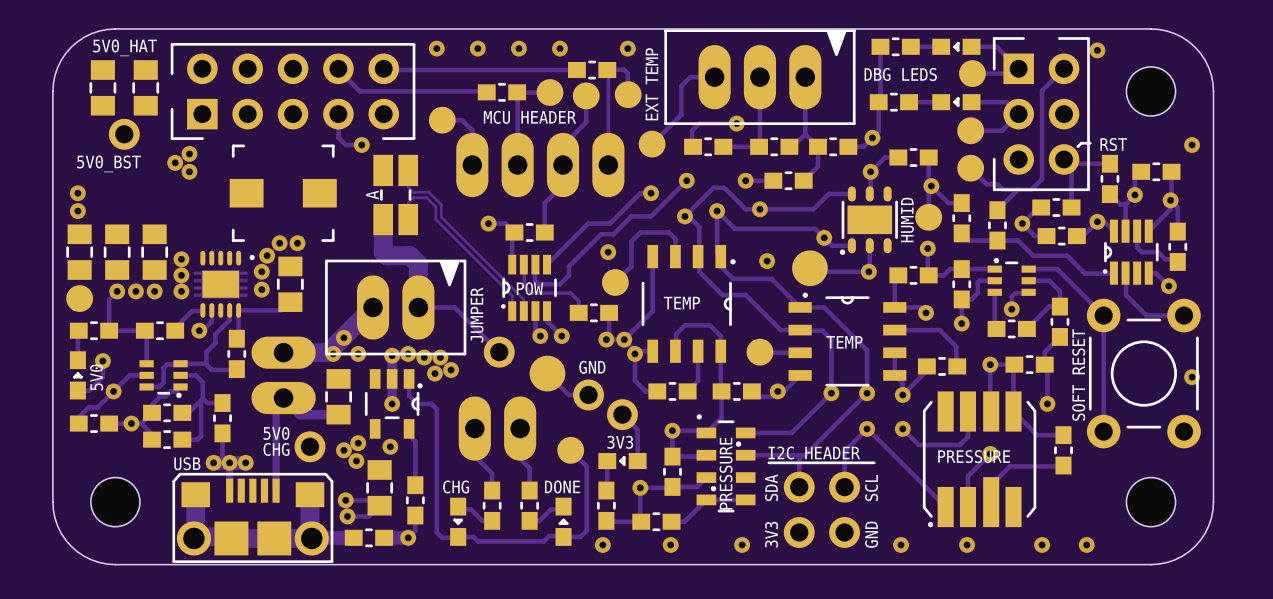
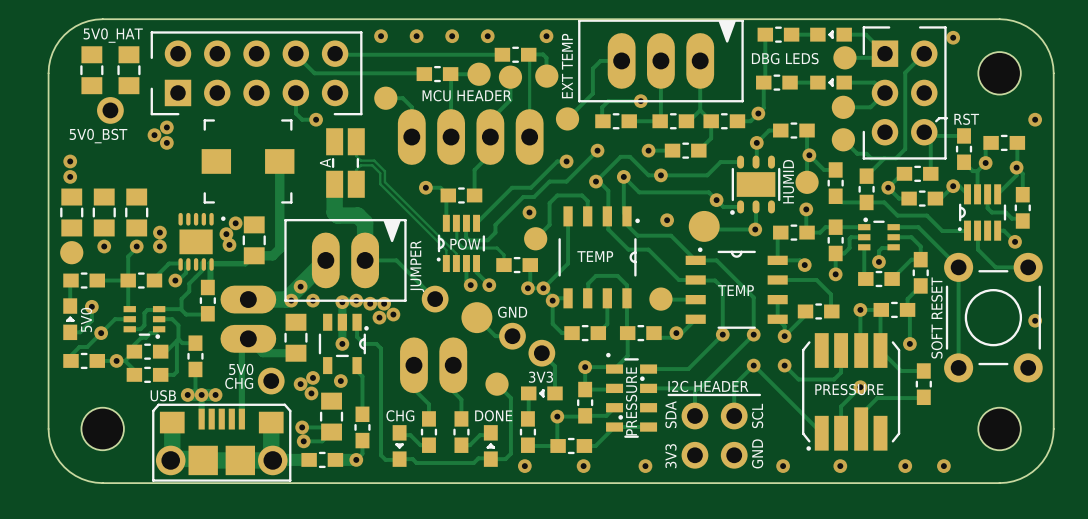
track: none -> (279, 161) (279, 248) (272, 255) (254, 255) (245, 264) (211, 264) (211, 283) (207, 292)
via: (279, 243) -> none
via: (297, 243) -> none
part footprint: [193, 250, 255, 318] -> [178, 212, 226, 271]
via: (267, 255) -> none
via: (181, 259) -> none
via: none -> (235, 223)
via: (261, 271) -> none
via: none -> (226, 234)
track: (117, 291) (109, 299) (109, 330) -> none
via: (135, 291) -> none
track: (146, 332) (146, 363) -> (136, 248) (128, 256) (128, 307) (129, 309)

